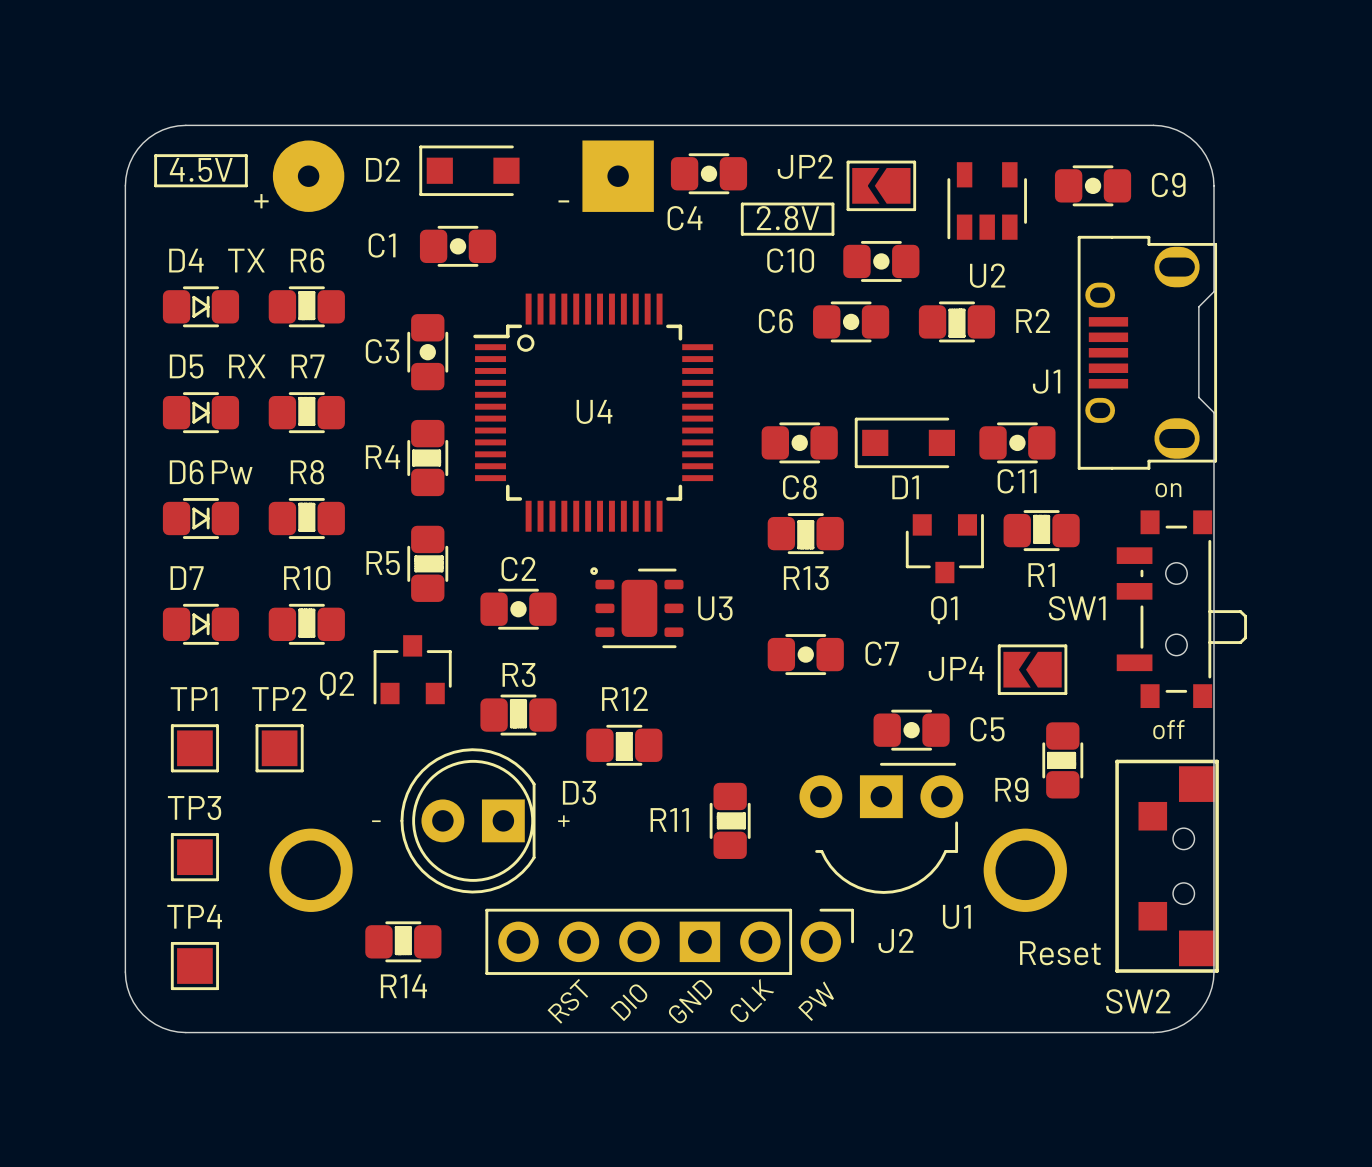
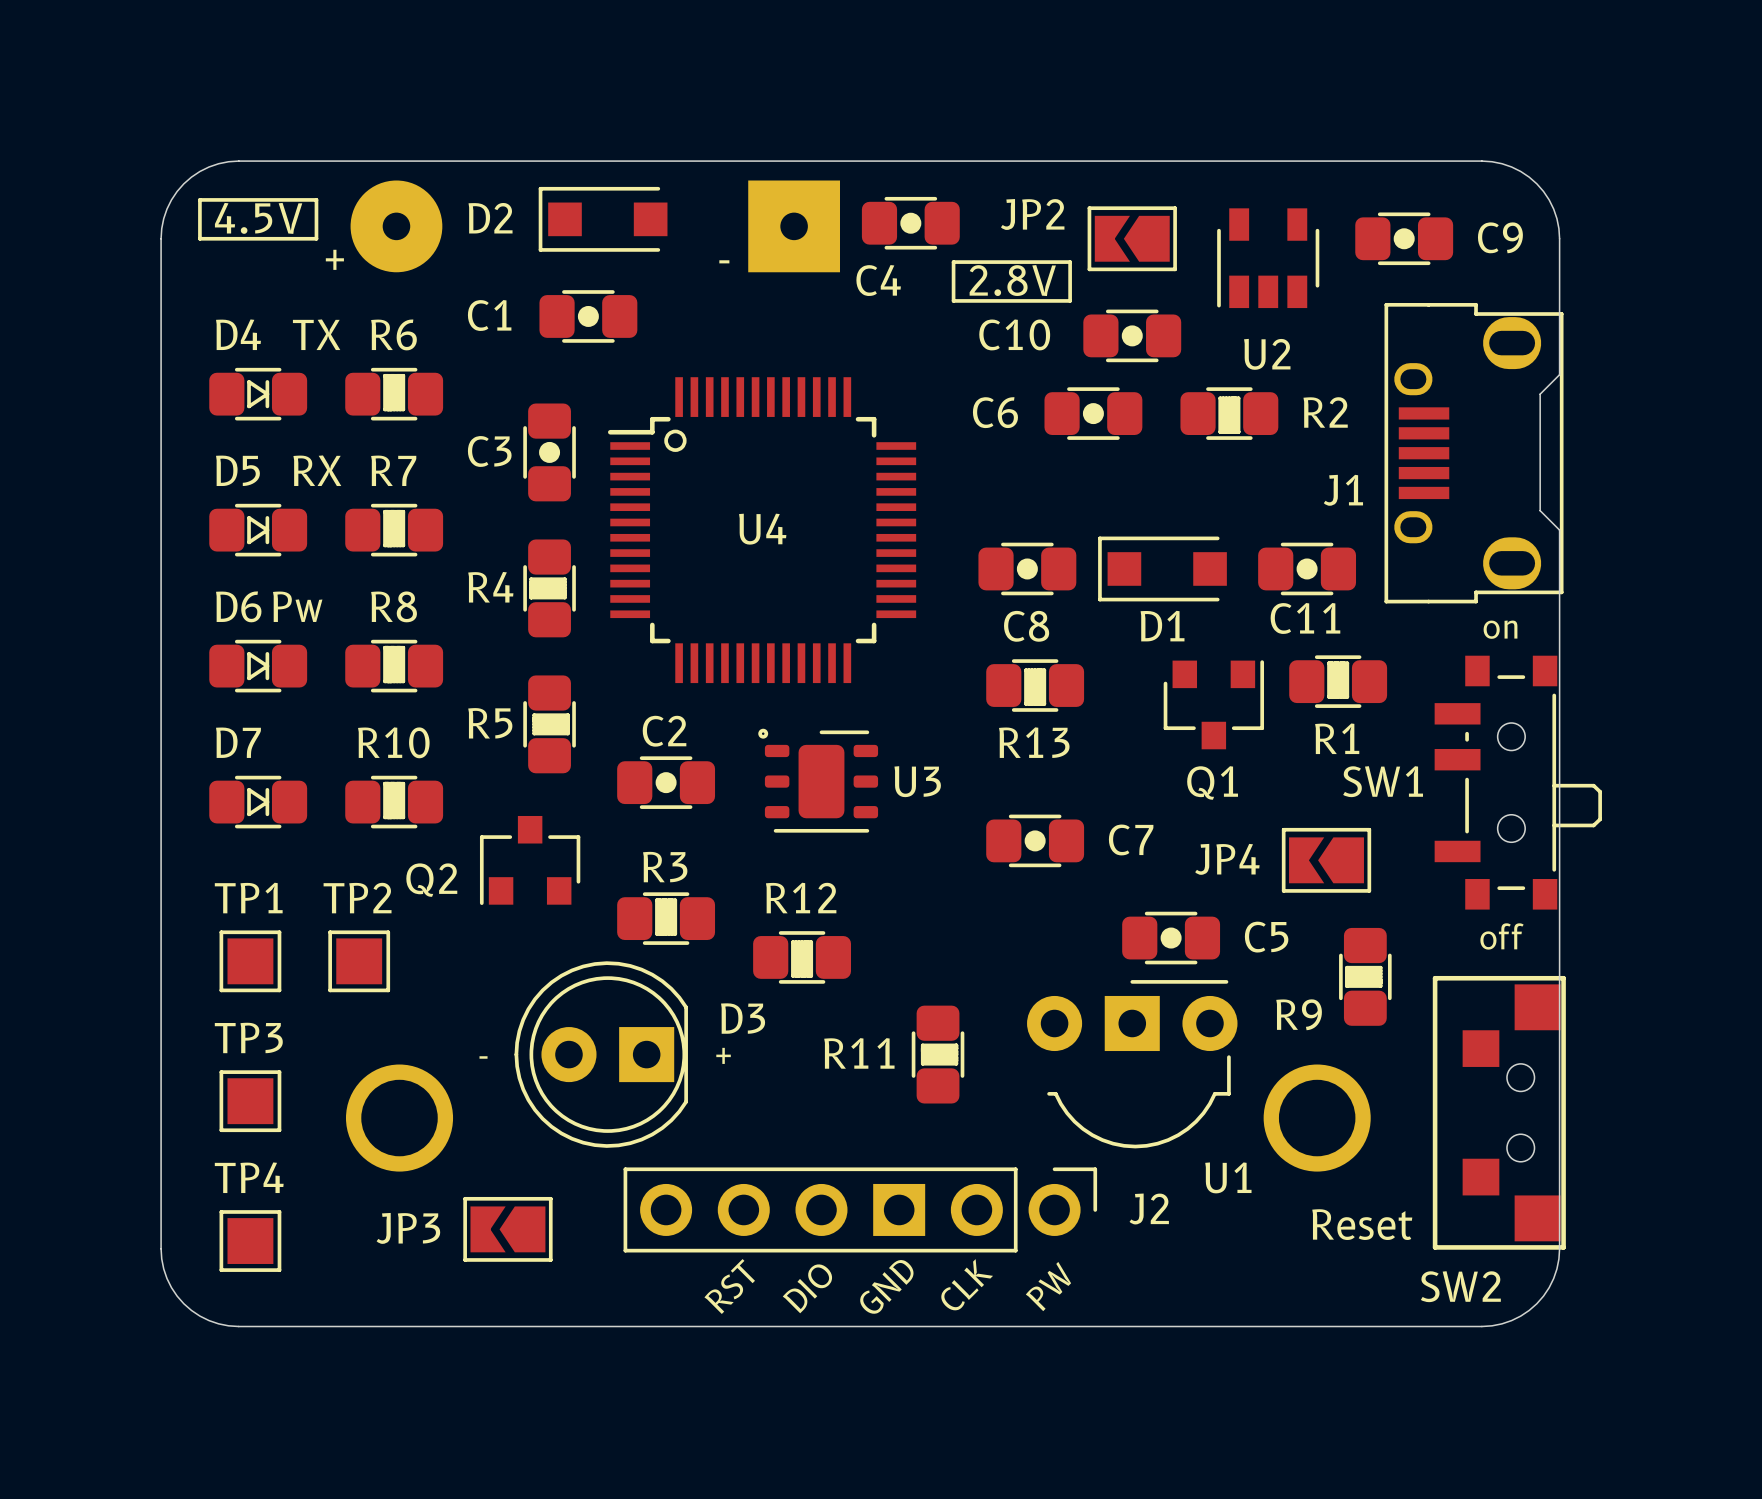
R14: (403, 941) -> none
JP3: none -> (507, 1229)

